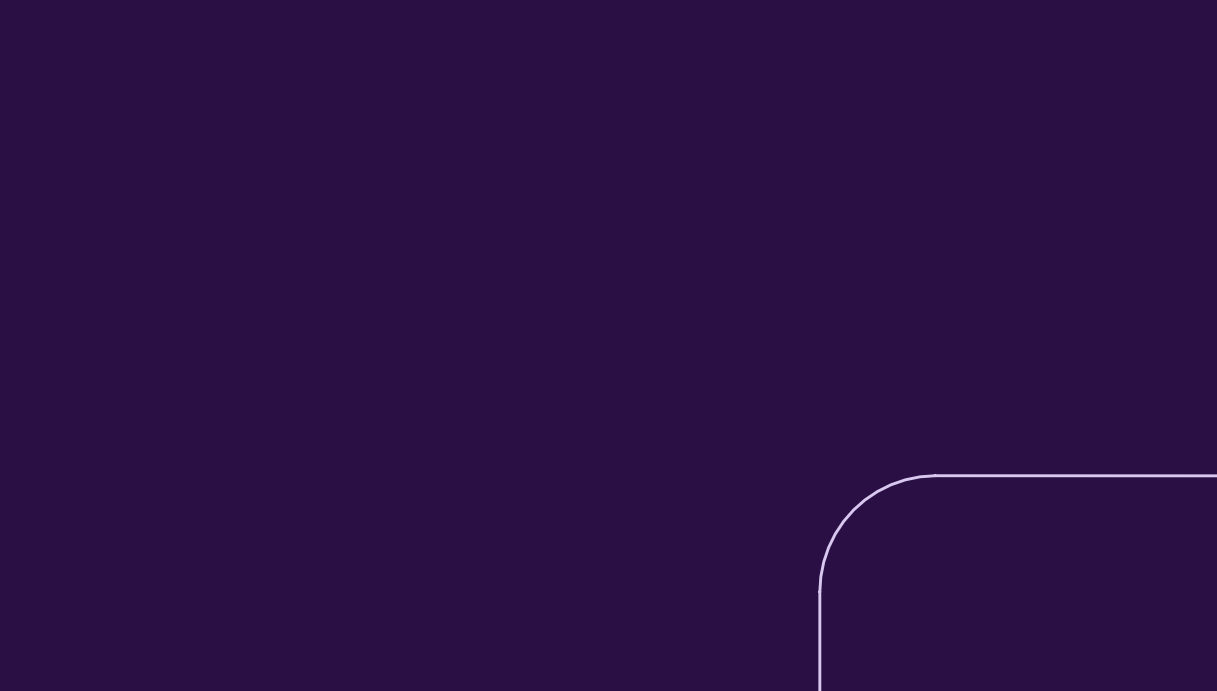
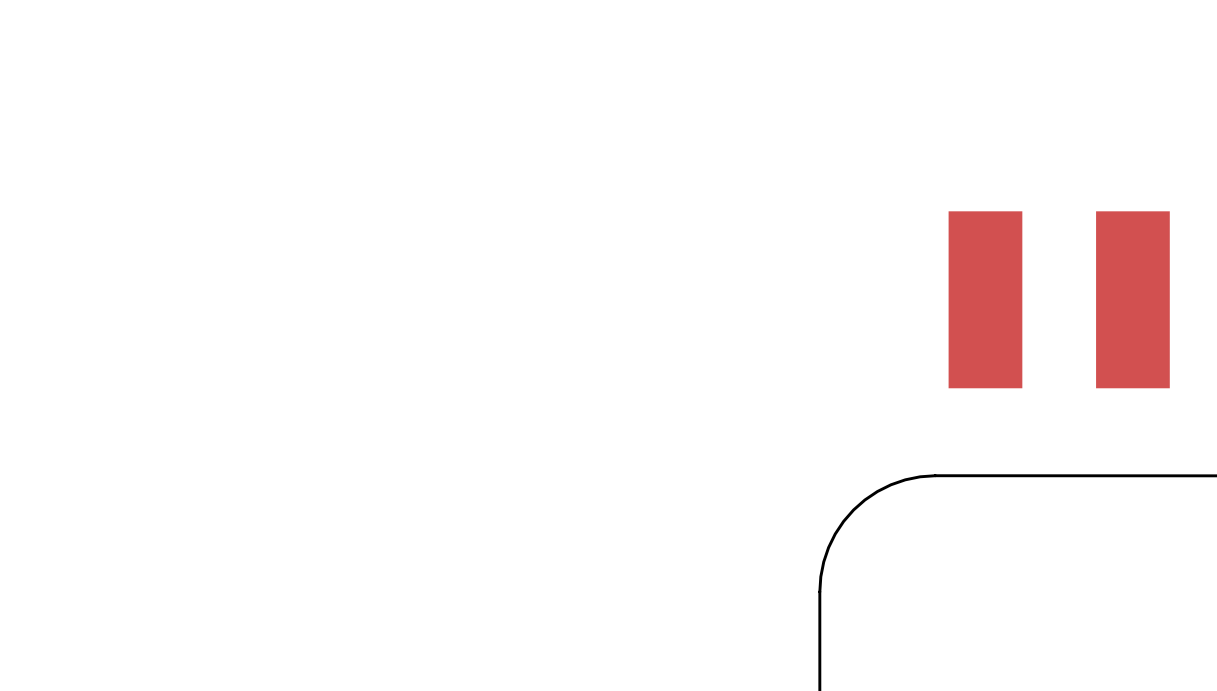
part: none -> (1059, 299)

